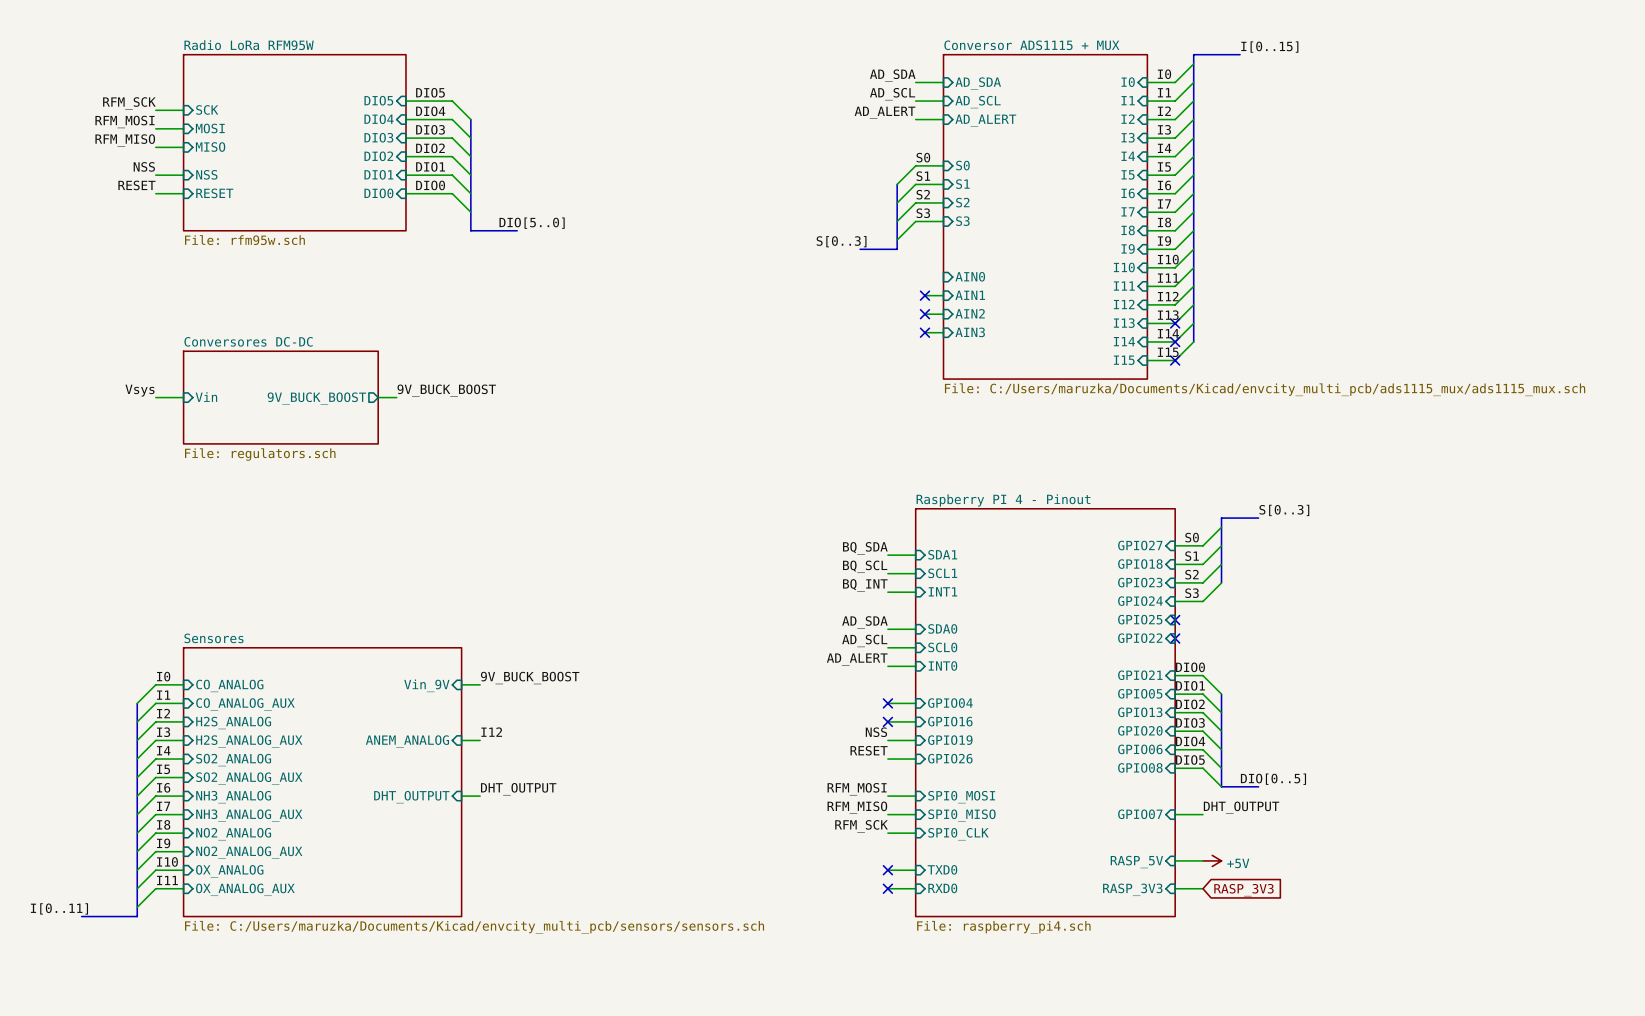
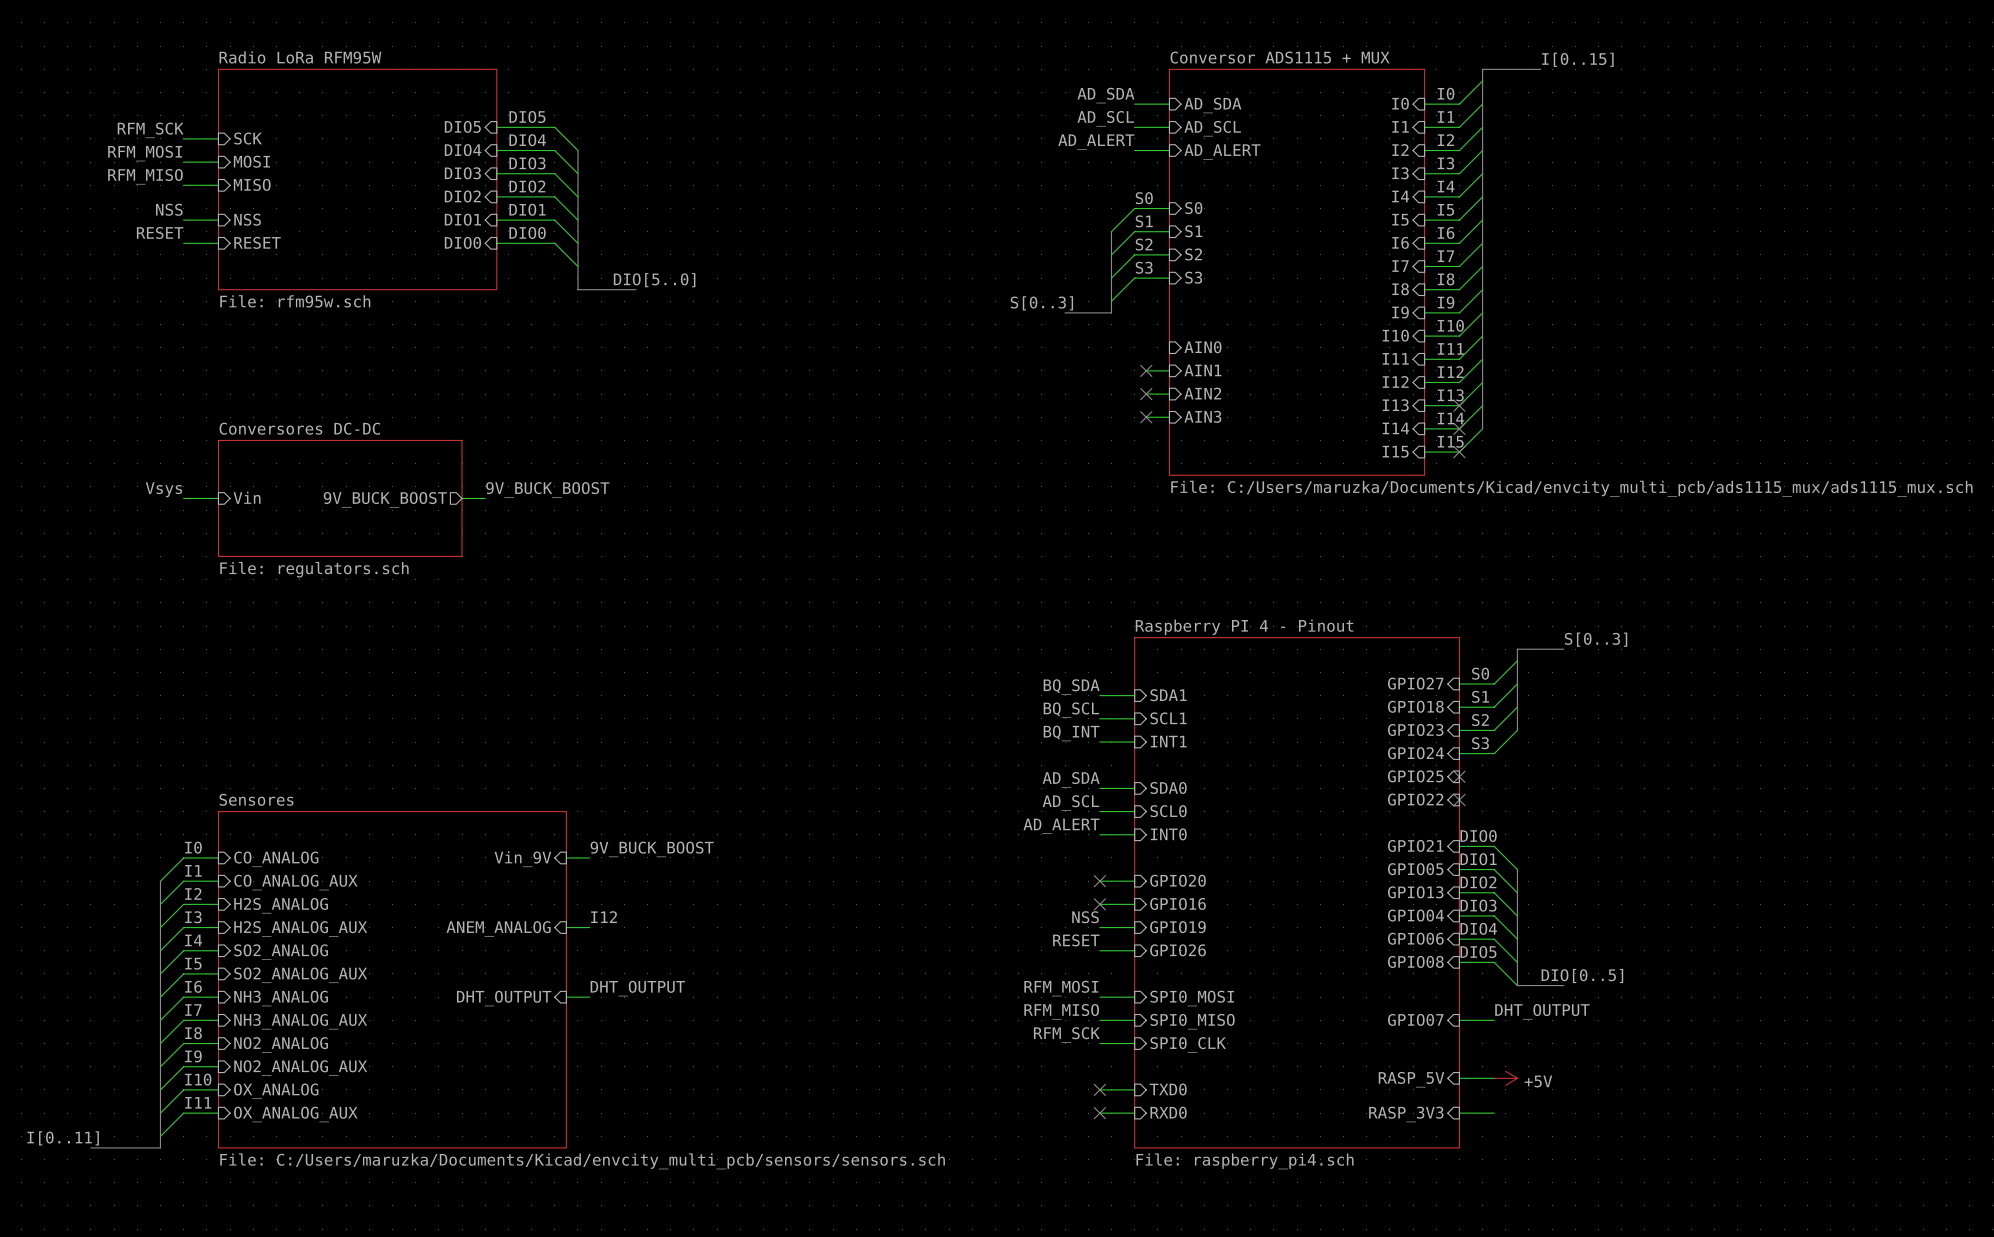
sheet pin: GPIO04 (950, 703) -> GPIO20 (1178, 880)
sheet pin: GPIO20 (1140, 730) -> GPIO04 (1415, 915)
global label: RASP_3V3 (1243, 890) -> none

